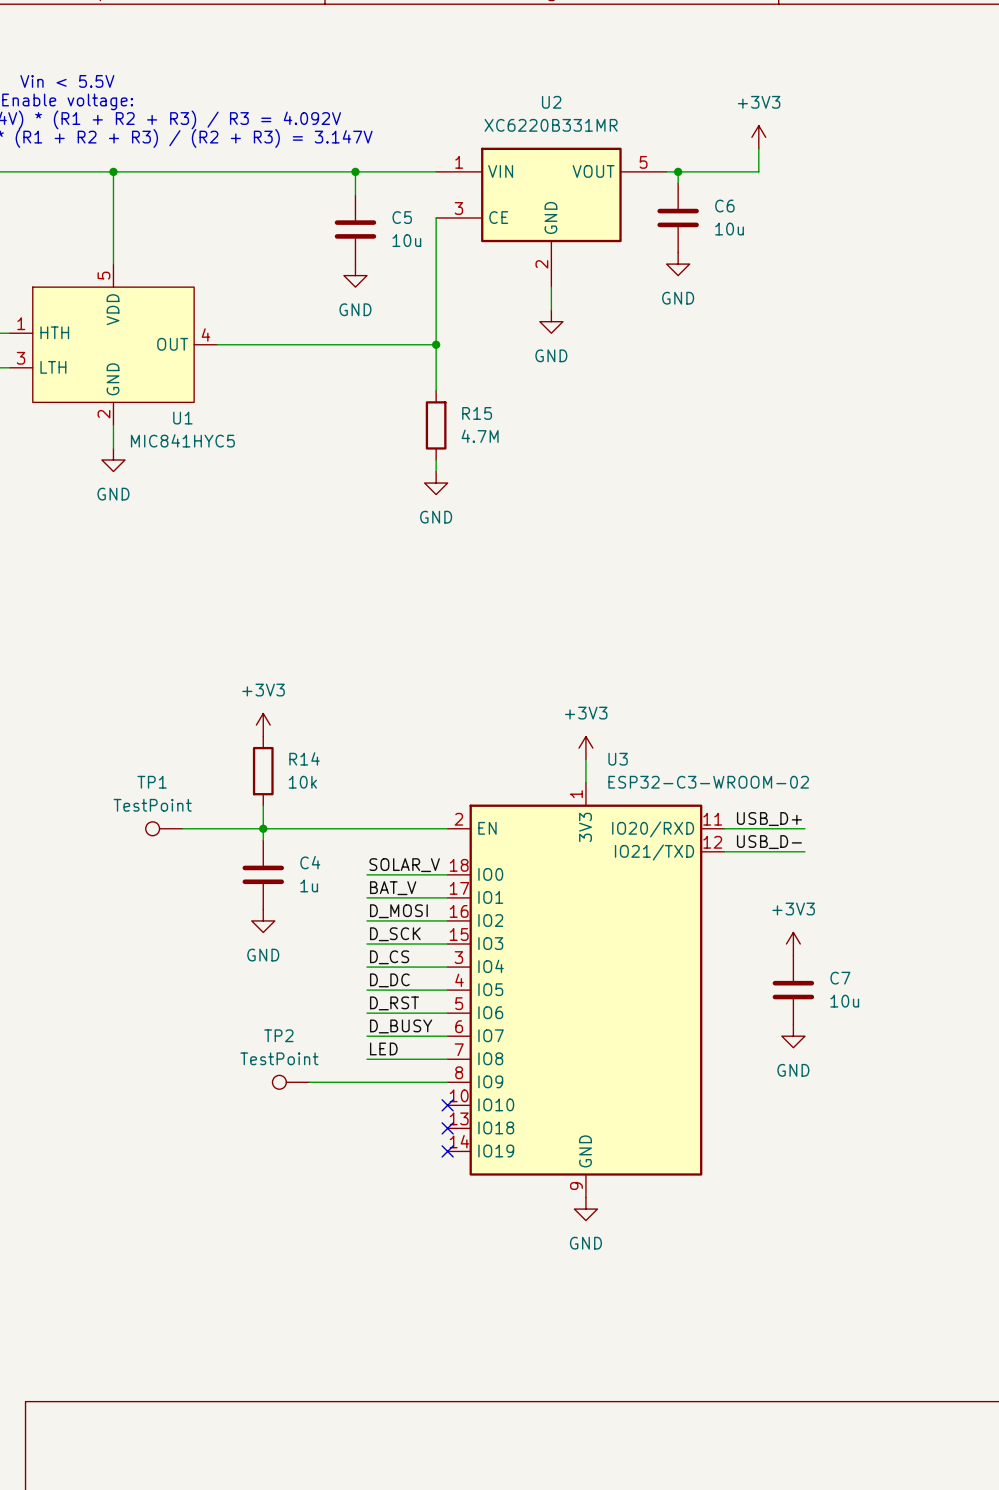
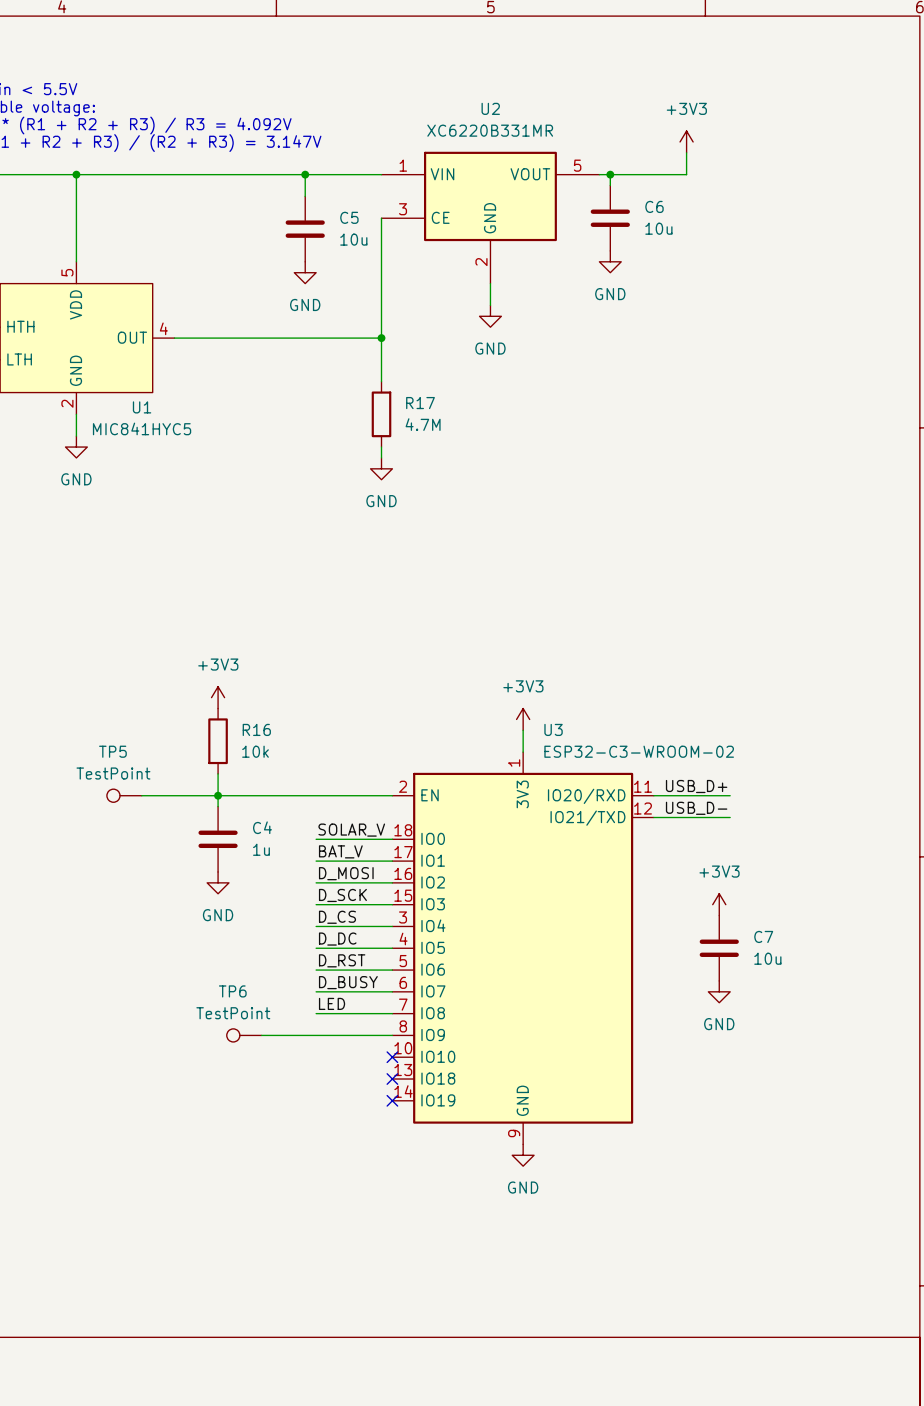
R15 name: R15 (477, 413) -> R17 (420, 403)
R14 name: R14 (304, 758) -> R16 (256, 729)
TP1 name: TP1 (152, 782) -> TP5 (112, 751)
TP2 name: TP2 (278, 1035) -> TP6 (232, 991)

